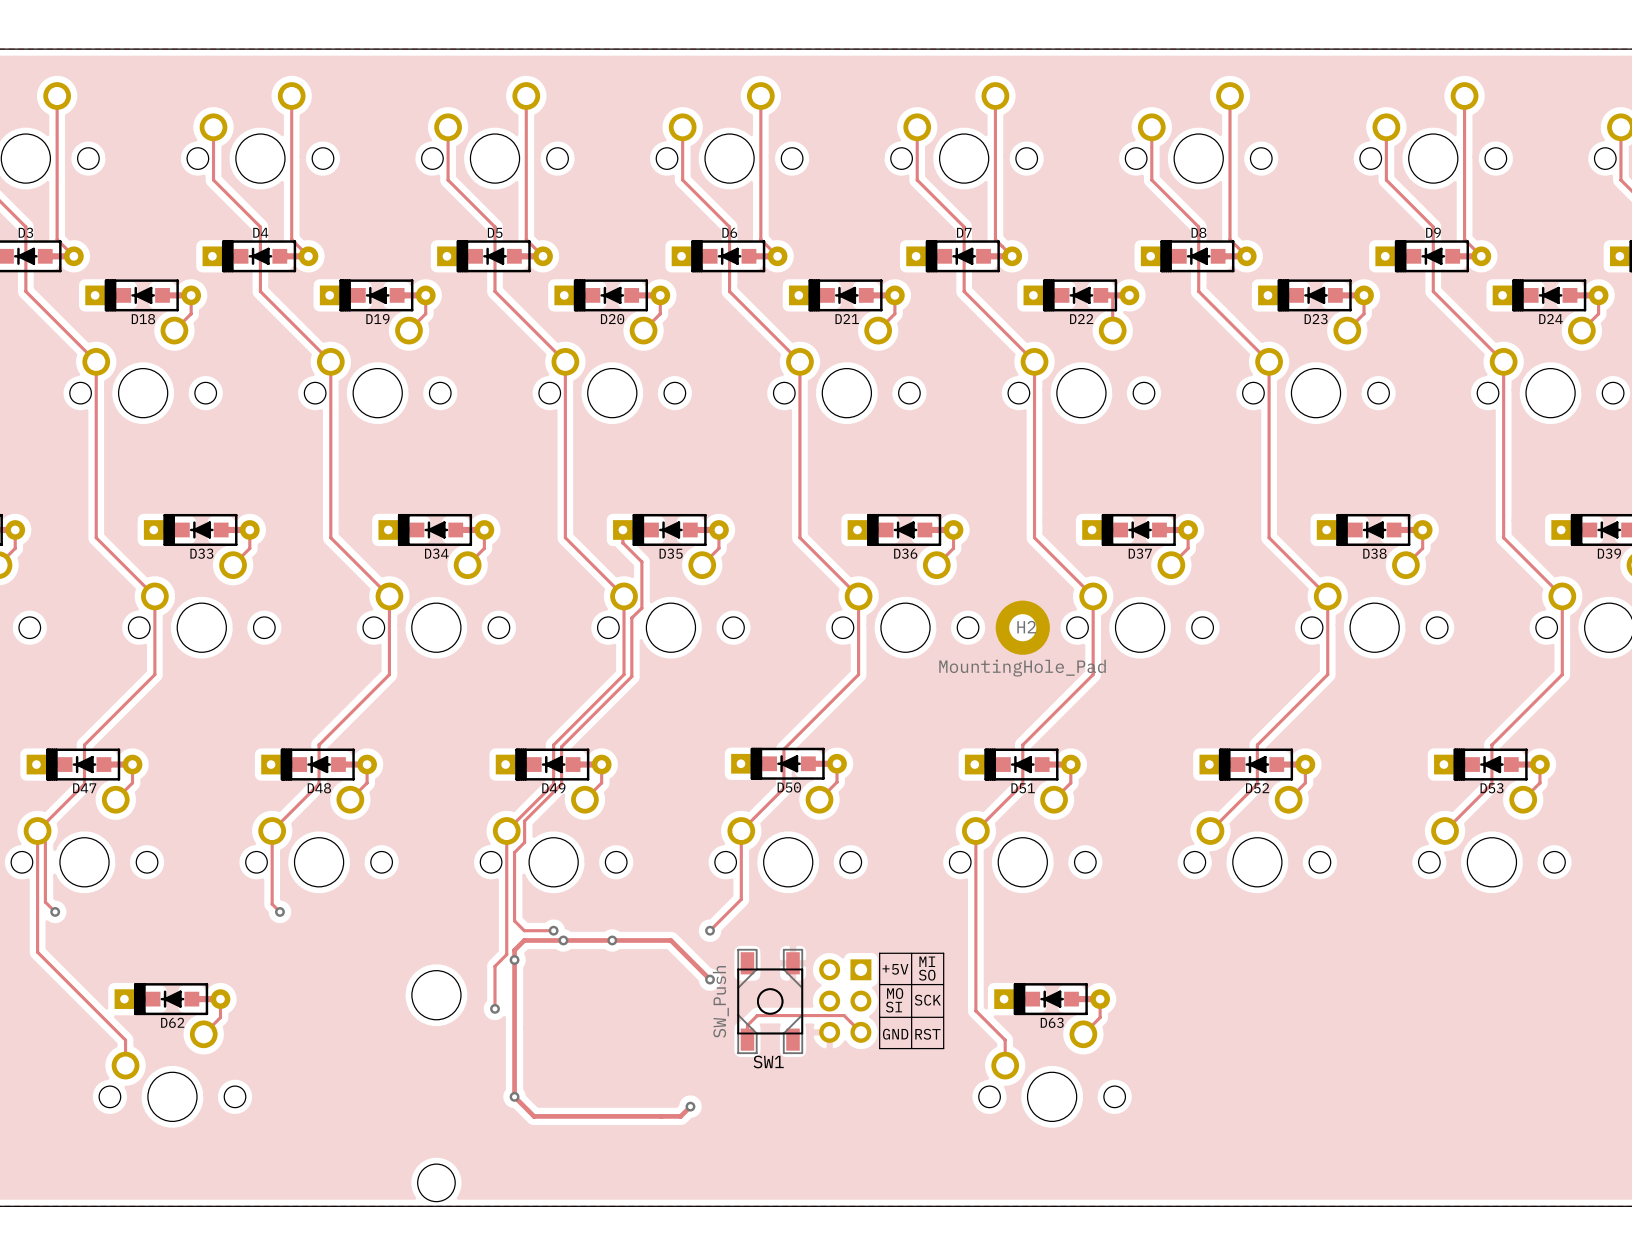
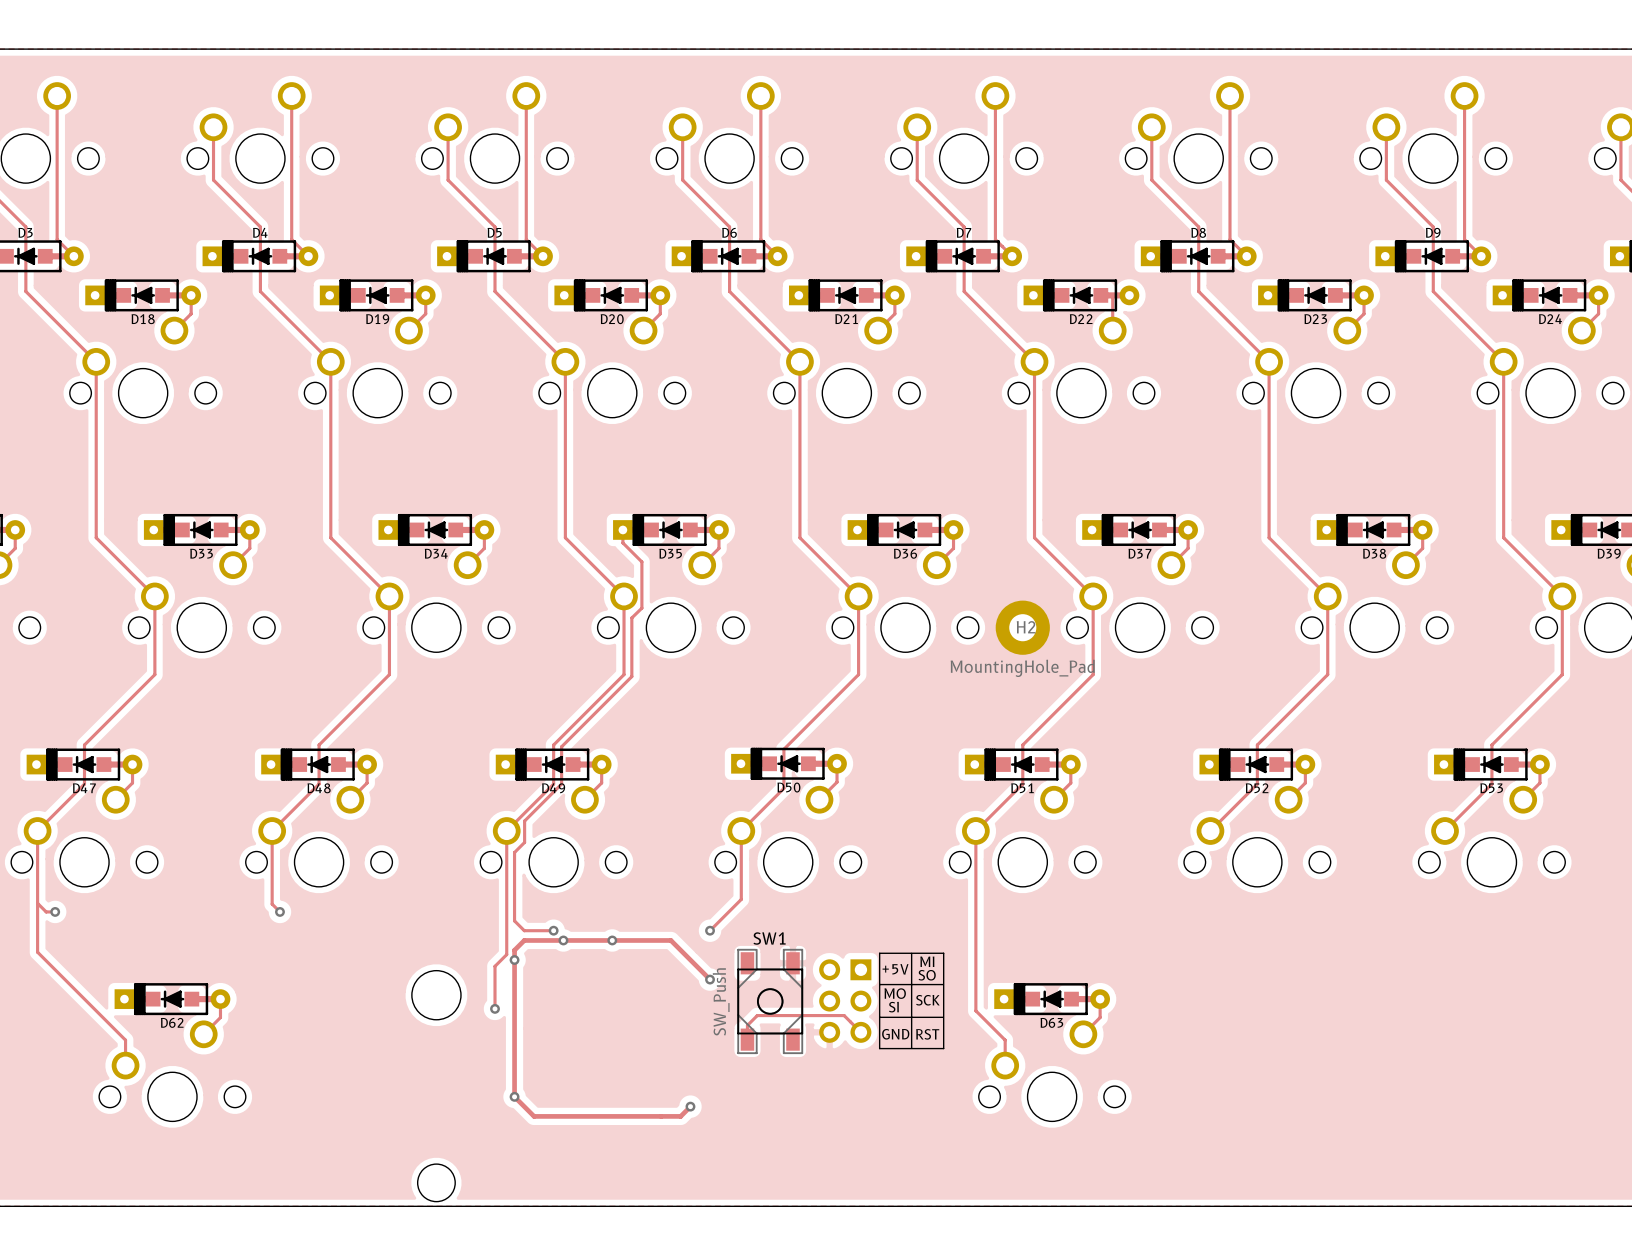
track: (37, 834) (45, 842) (45, 902) (55, 911) -> (37, 903) (46, 911) (55, 911)
SW1 name position: SW1 (768, 1061) -> SW1 (769, 938)

